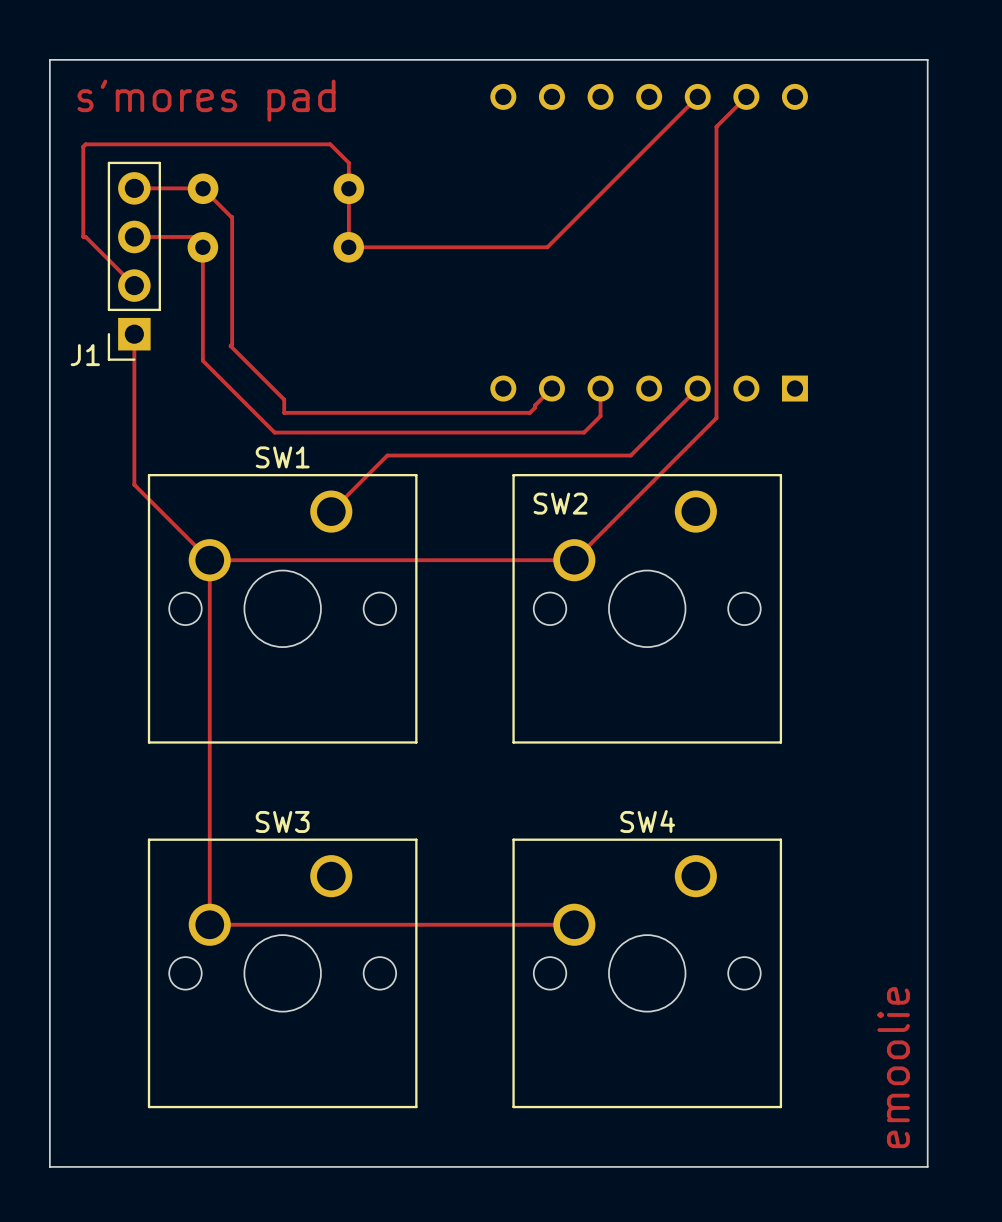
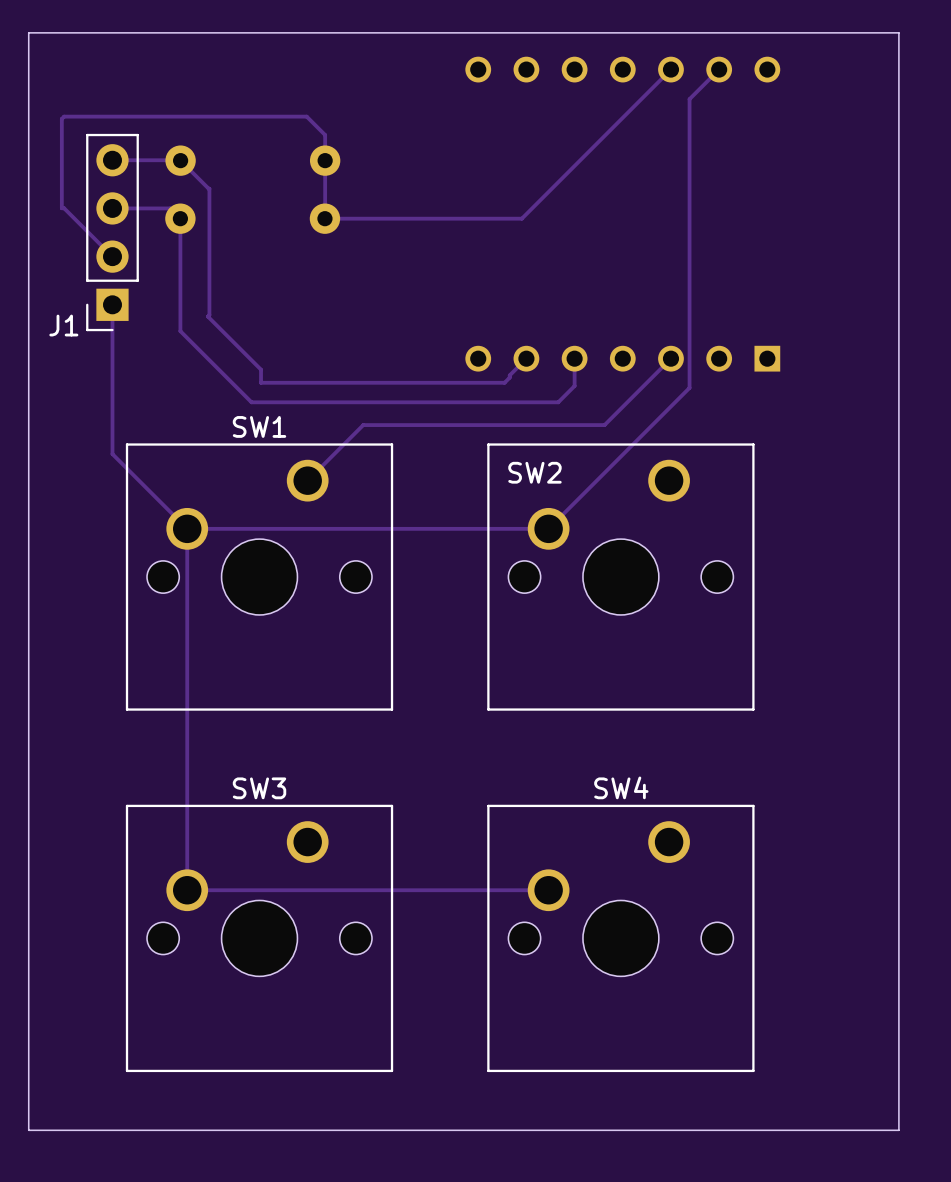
text: s'mores pad (206, 100) -> none
text: emoolie (893, 1067) -> none

